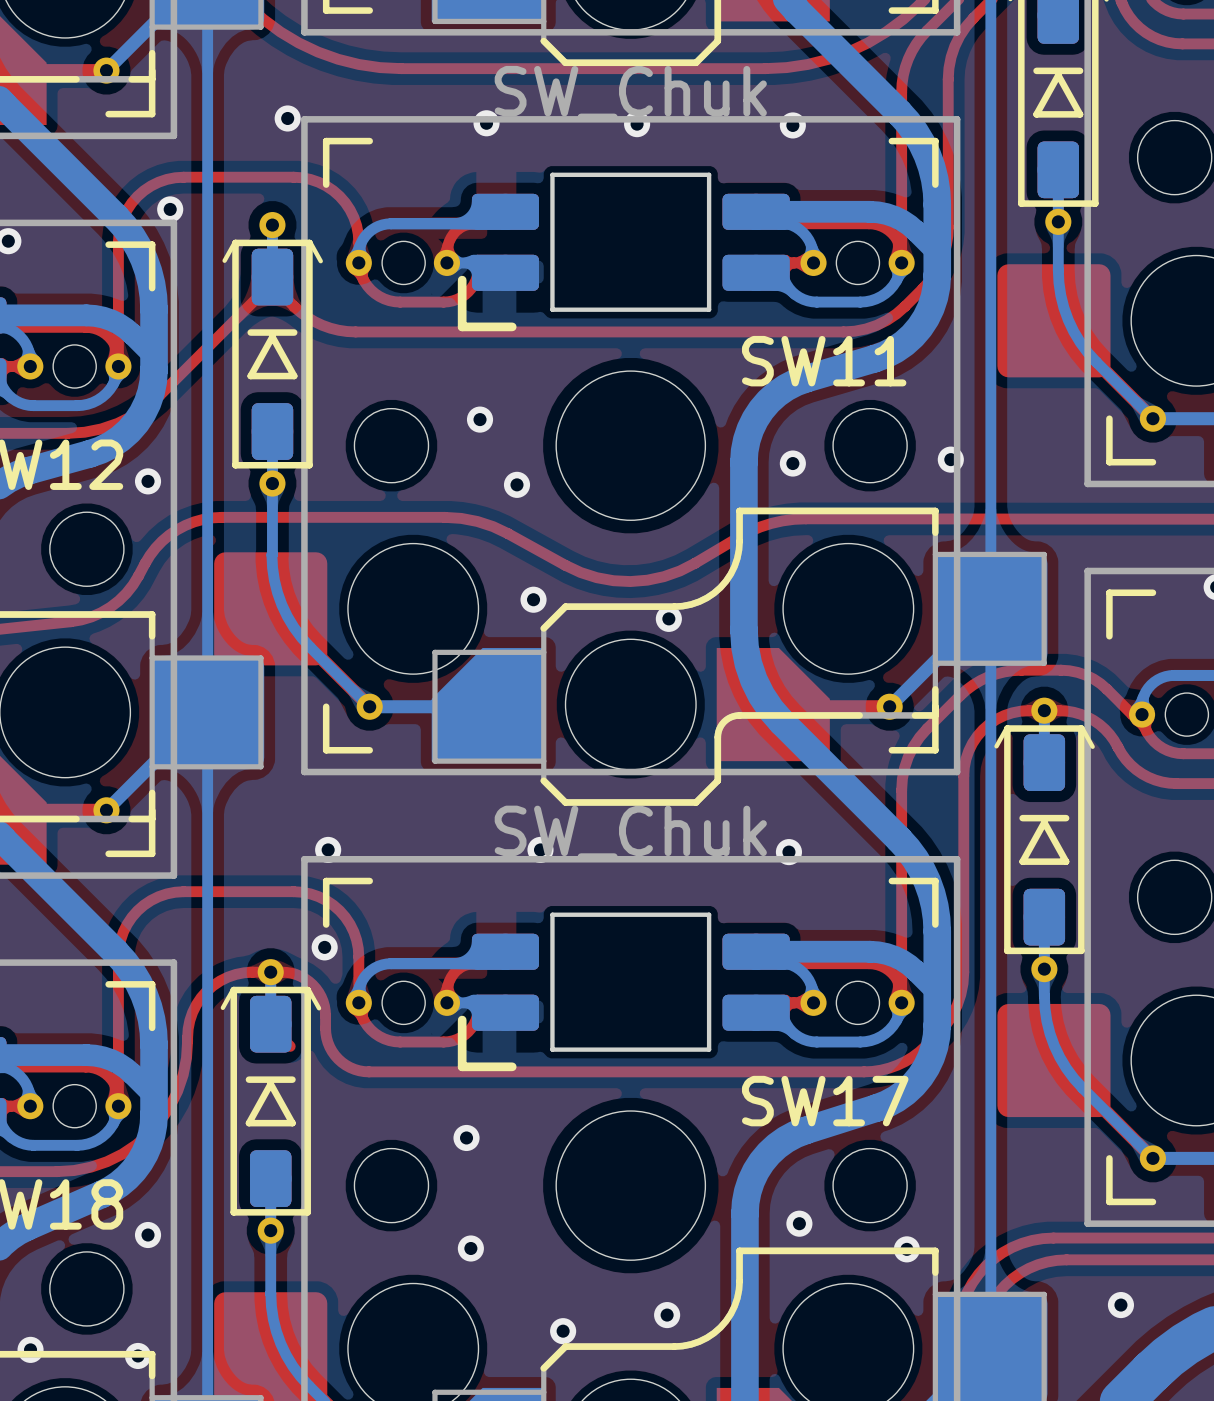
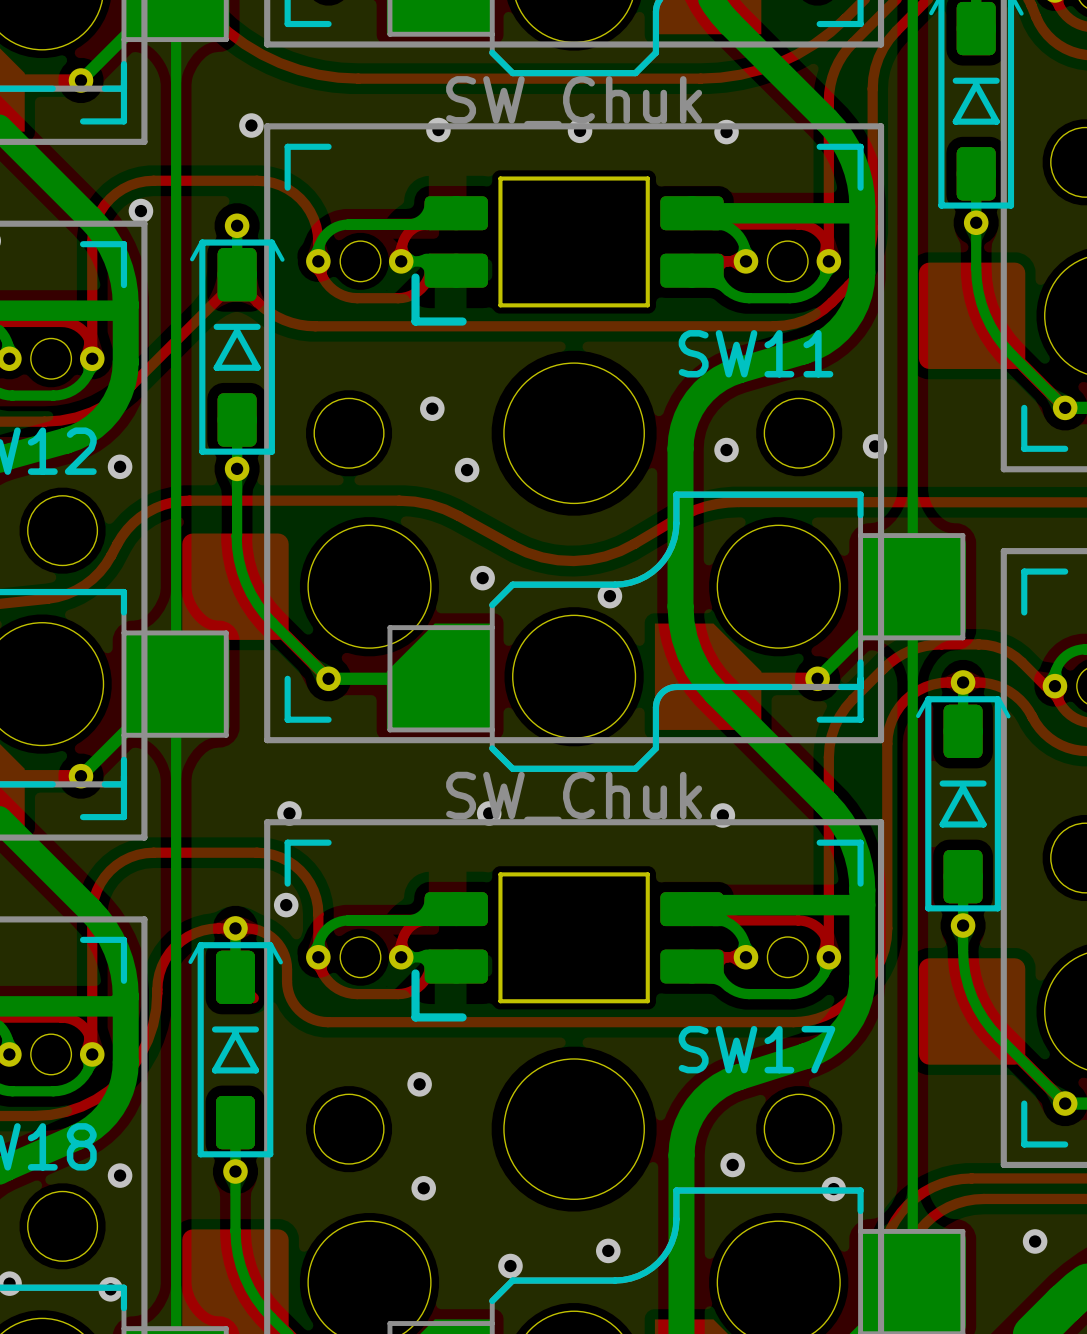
bottom track: (869, 211) (886, 214) (902, 220) (937, 252) -> (798, 213) (855, 213) (862, 206)
bottom track: (86, 315) (103, 317) (119, 324) (154, 355) -> (62, 310) (120, 310) (125, 305)
bottom track: (756, 951) (869, 951) (886, 953) (909, 965) (937, 992) -> (691, 909) (696, 905) (862, 905)
bottom track: (86, 1055) (103, 1057) (119, 1063) (154, 1095) -> (62, 1006) (115, 1006) (125, 996) (125, 1007)

